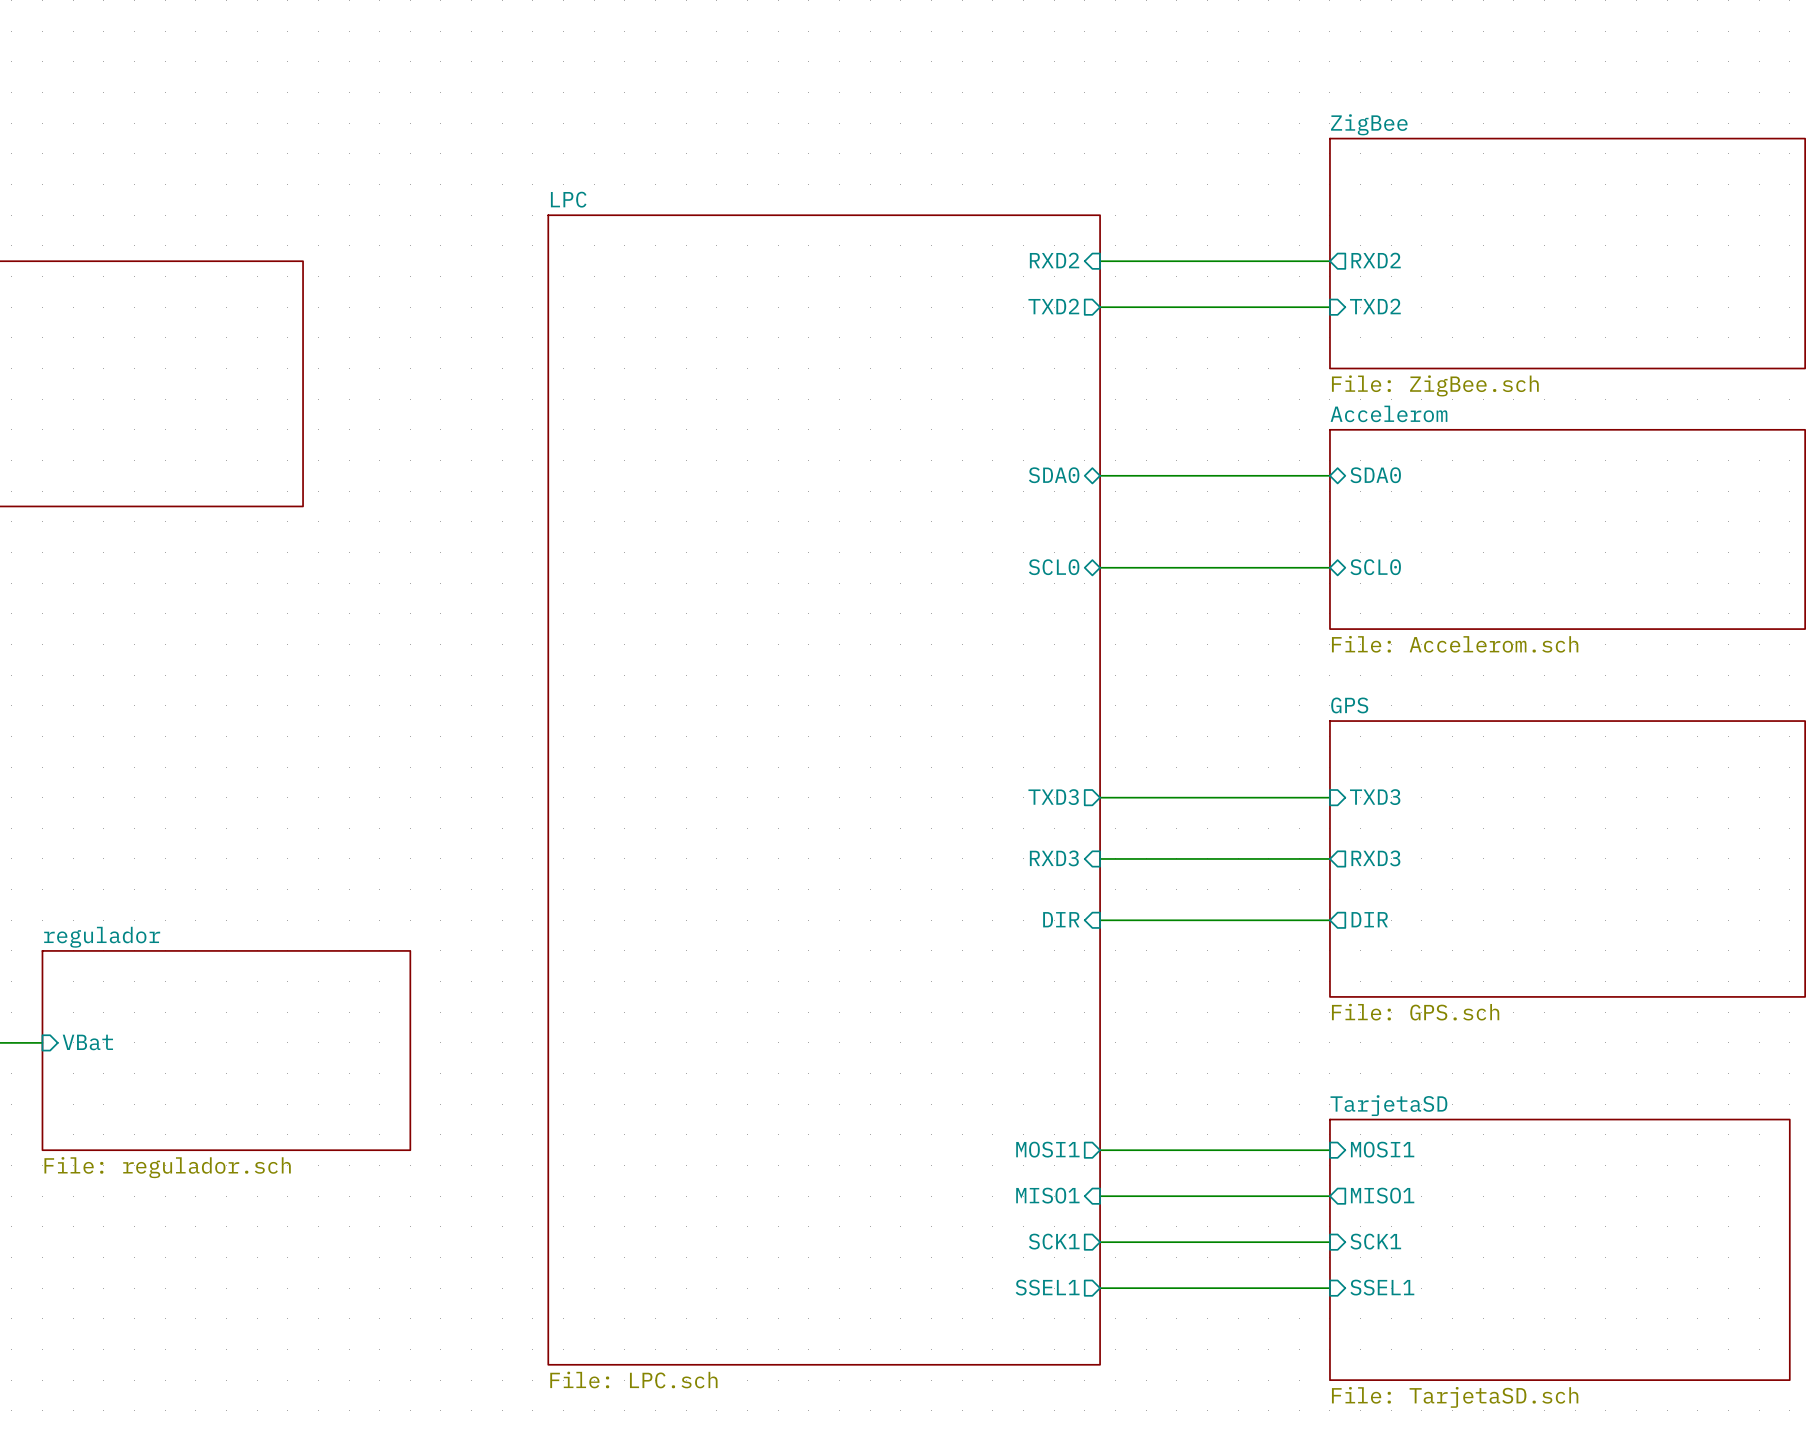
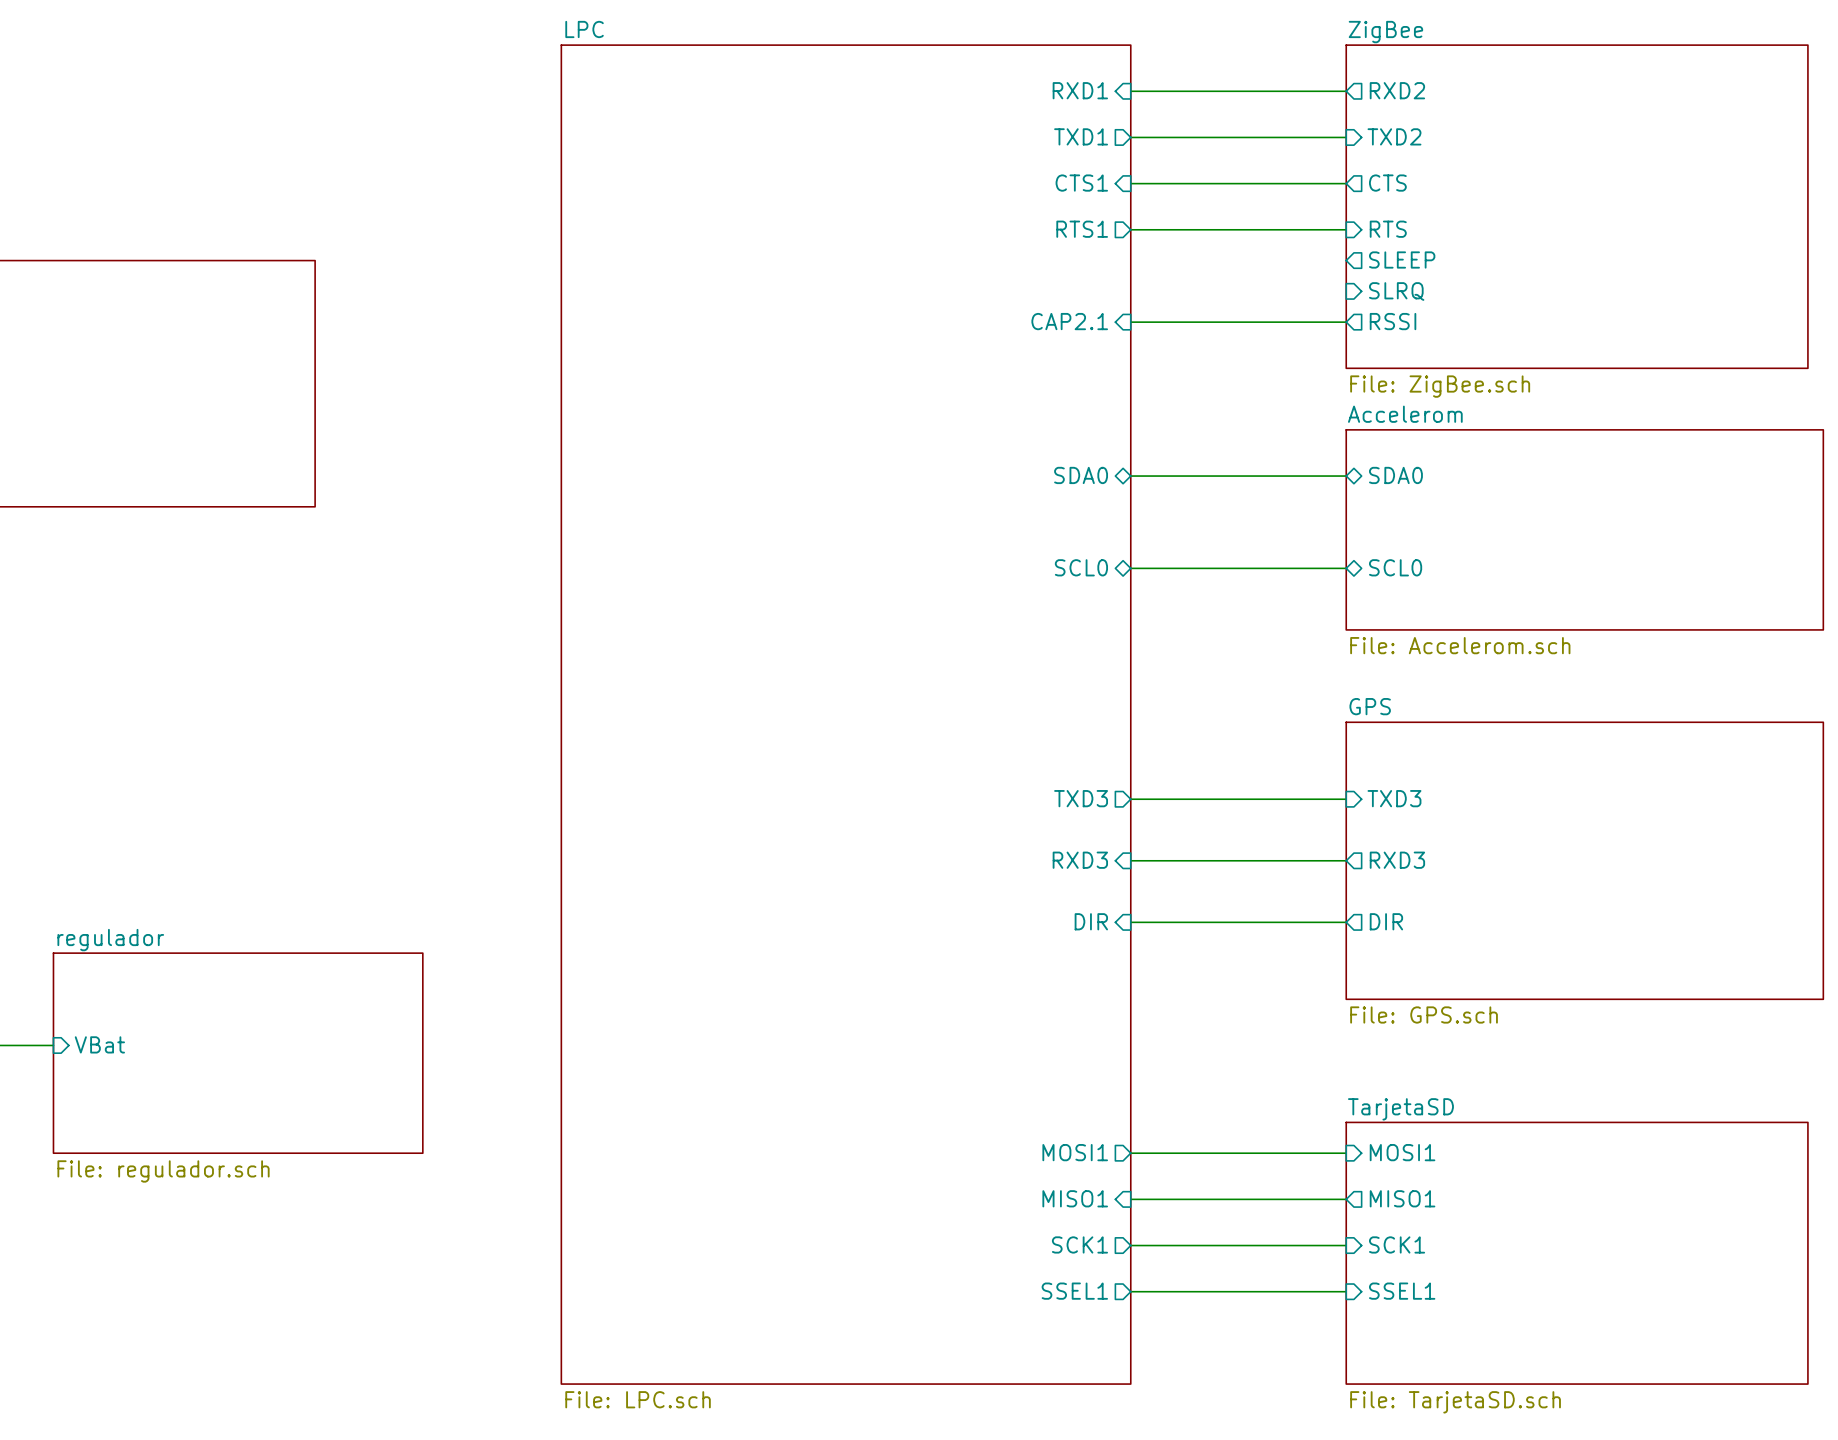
sheet pin: none -> RXD2 (1397, 90)
sheet pin: none -> RXD1 (1080, 90)
wire: none -> (1130, 91) (1346, 91)
sheet pin: none -> TXD2 (1394, 136)
sheet pin: none -> TXD1 (1081, 136)
wire: none -> (1130, 137) (1346, 137)
sheet pin: none -> CTS1 (1081, 183)
wire: none -> (1130, 183) (1346, 183)
sheet pin: none -> CTS (1387, 183)
sheet ZigBee: none -> File: ZigBee.sch (1577, 206)
sheet pin: none -> RTS1 (1082, 229)
sheet pin: none -> RTS (1388, 229)
wire: none -> (1130, 229) (1346, 229)
sheet ZigBee: File: ZigBee.sch (1567, 253) -> none
sheet pin: RXD2 (1054, 260) -> none
sheet pin: RXD2 (1376, 260) -> SLEEP (1402, 260)
wire: (1100, 261) (1329, 261) -> none
sheet pin: none -> SLRQ (1396, 291)
sheet pin: TXD2 (1053, 306) -> none
sheet pin: TXD2 (1375, 306) -> none
wire: (1100, 307) (1329, 307) -> none
sheet pin: none -> CAP2.1 (1069, 321)
sheet pin: none -> RSSI (1393, 321)
wire: none -> (1130, 322) (1346, 322)
sheet pin position: SDA0 (1054, 475) -> SDA0 (1081, 475)
wire: (1100, 475) (1115, 475) -> none
sheet pin position: SCL0 (1054, 567) -> SCL0 (1081, 567)
wire: (1100, 567) (1115, 567) -> none
sheet LPC: none -> File: LPC.sch (846, 714)
sheet LPC: File: LPC.sch (824, 790) -> none
sheet pin position: TXD3 (1053, 797) -> TXD3 (1081, 798)
wire: (1100, 797) (1115, 797) -> none
sheet pin position: RXD3 (1054, 858) -> RXD3 (1080, 860)
wire: (1100, 858) (1115, 858) -> none
sheet pin position: DIR (1061, 919) -> DIR (1091, 921)
wire: (1100, 920) (1115, 920) -> none
sheet pin position: MOSI1 (1047, 1149) -> MOSI1 (1075, 1152)
wire: (1100, 1150) (1115, 1150) -> none
sheet pin position: MISO1 (1047, 1195) -> MISO1 (1075, 1198)
wire: (1100, 1196) (1115, 1196) -> none
sheet pin position: SCK1 (1054, 1241) -> SCK1 (1079, 1244)
wire: (1100, 1242) (1115, 1242) -> none
sheet pin position: SSEL1 (1047, 1287) -> SSEL1 (1074, 1291)
wire: (1100, 1288) (1115, 1288) -> none

